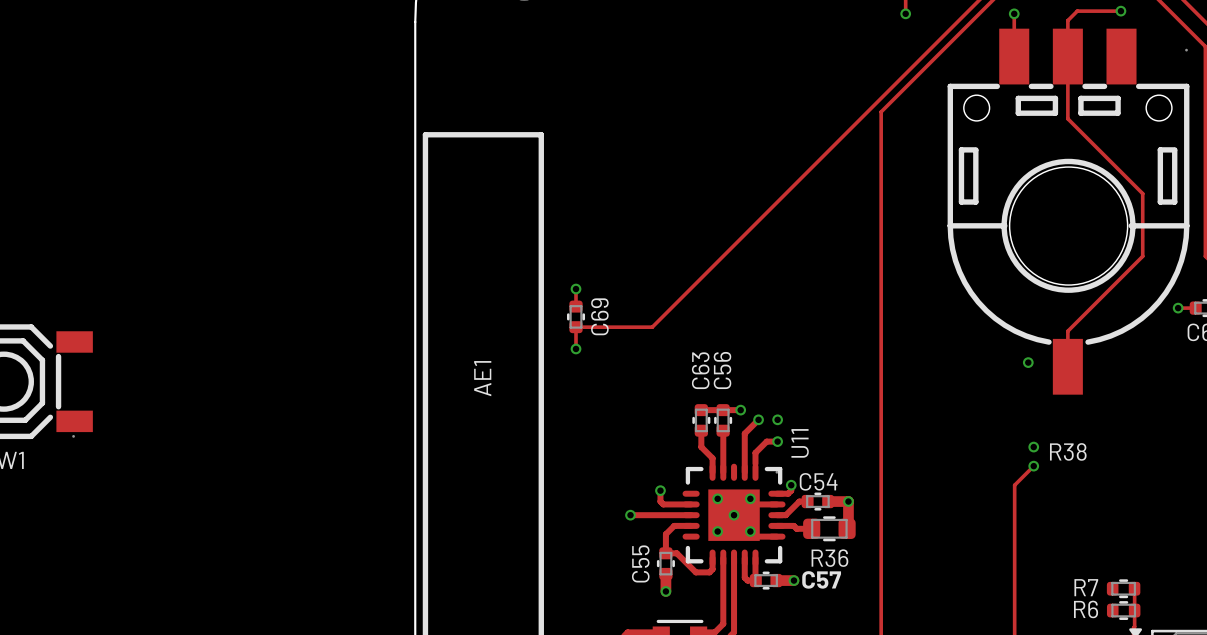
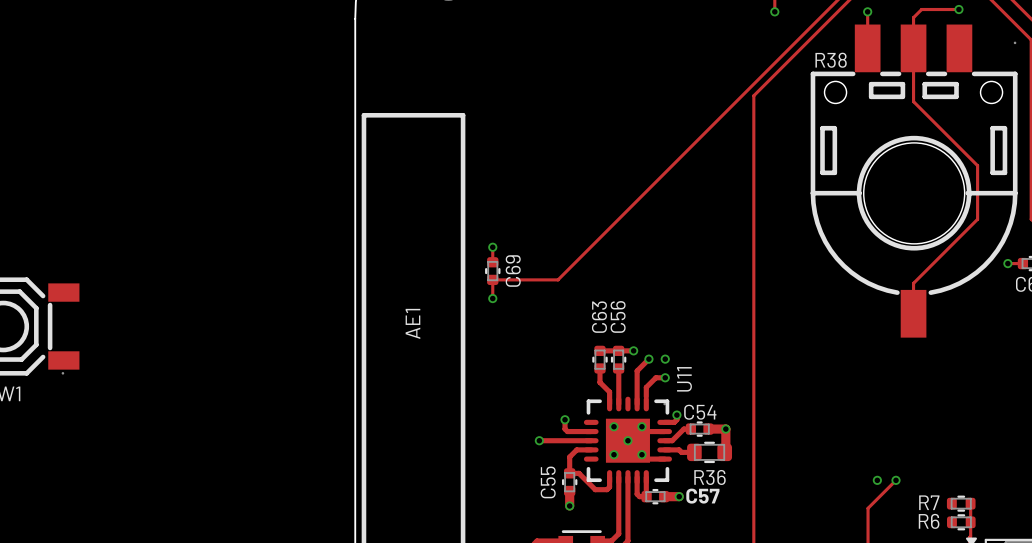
via: (1028, 362) -> none
via: (1033, 447) -> none
R38 name position: R38 (1068, 451) -> R38 (831, 60)
track: (1033, 466) (1014, 485) (1014, 594) -> (896, 480) (868, 508)
via: (1033, 466) -> none
via: none -> (877, 480)
via: none -> (896, 480)

